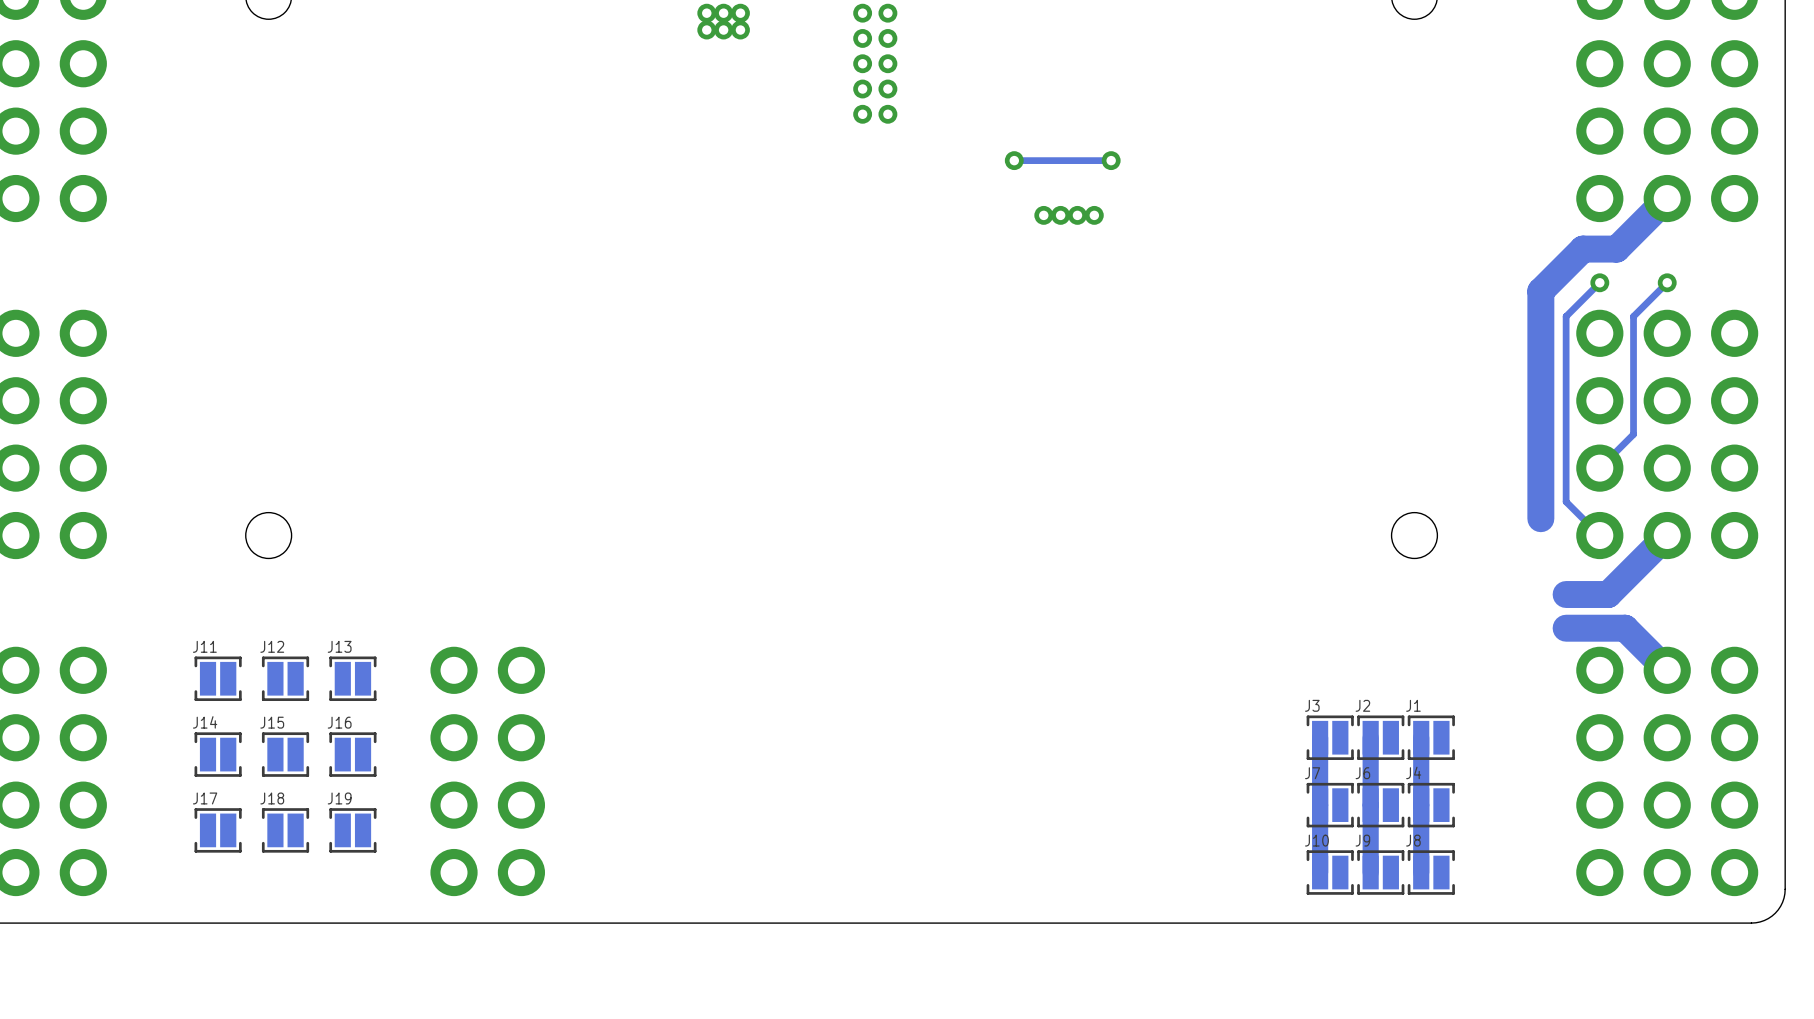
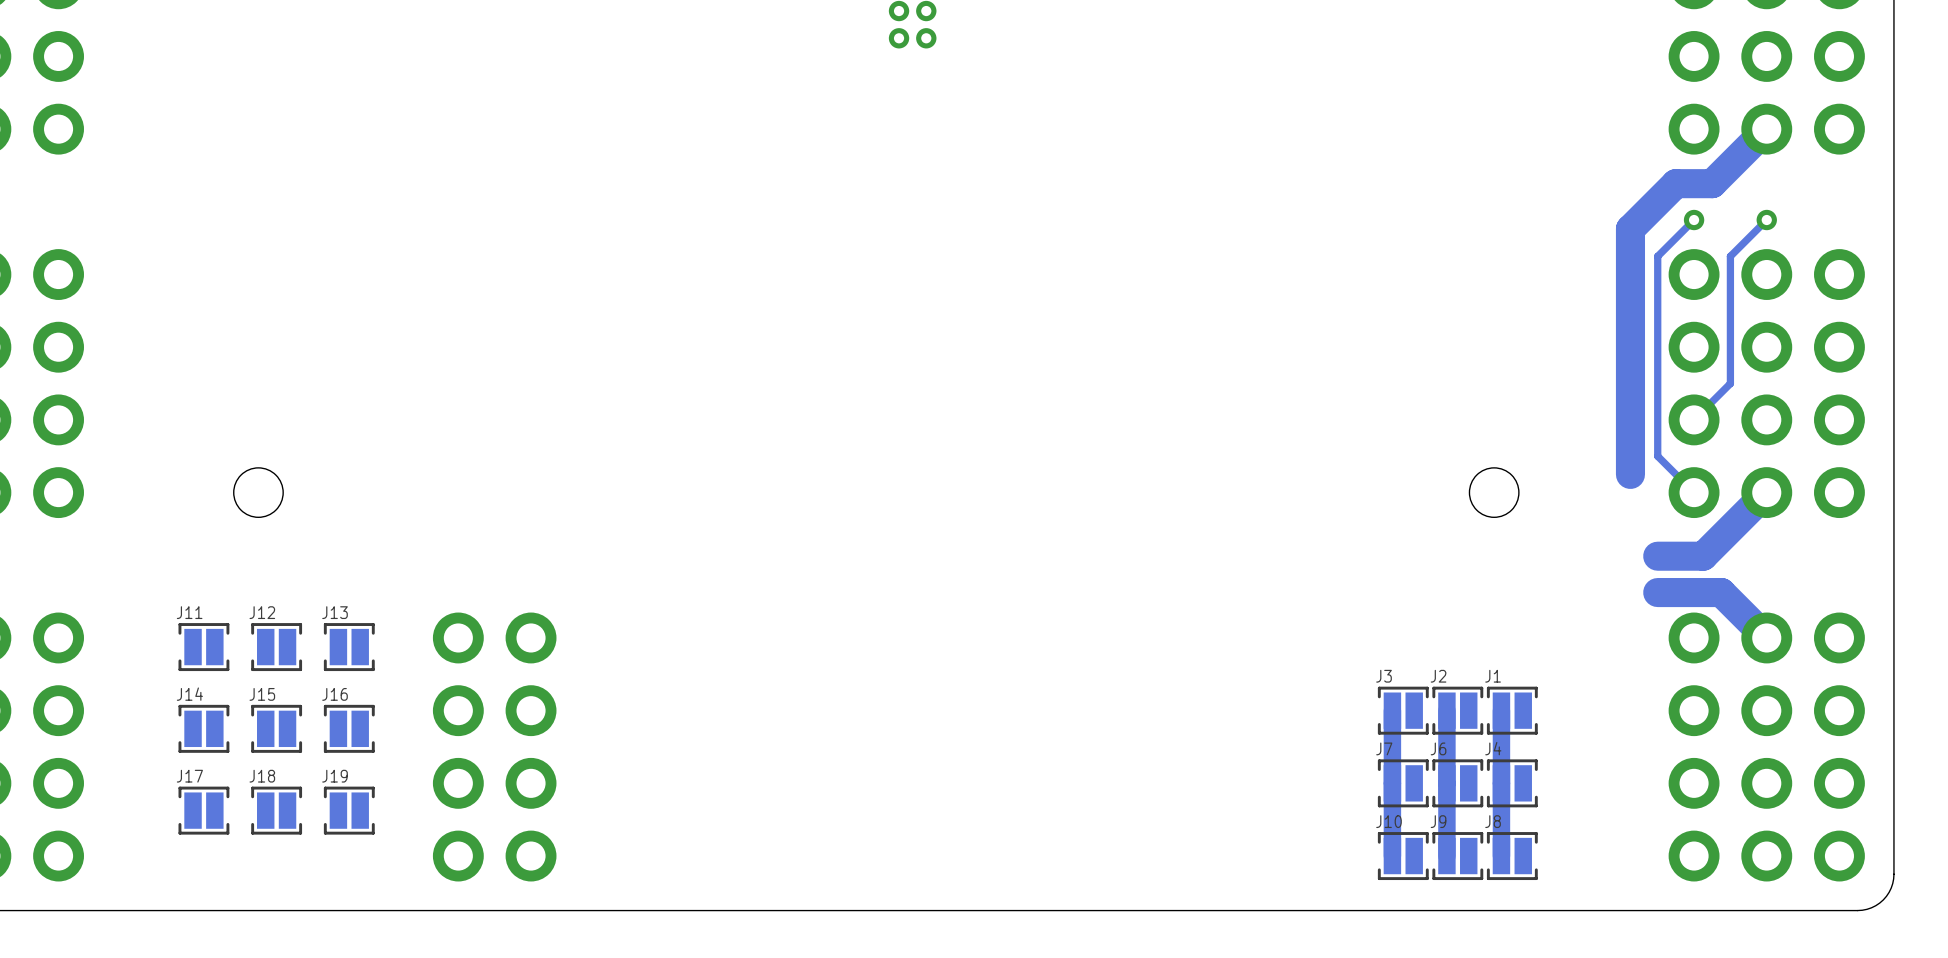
via: (1014, 160) -> none
track: (1111, 160) (1014, 160) -> none
via: (1111, 160) -> none
via: (1043, 215) -> none
via: (1060, 215) -> none
via: (1077, 215) -> none
via: (1094, 215) -> none

